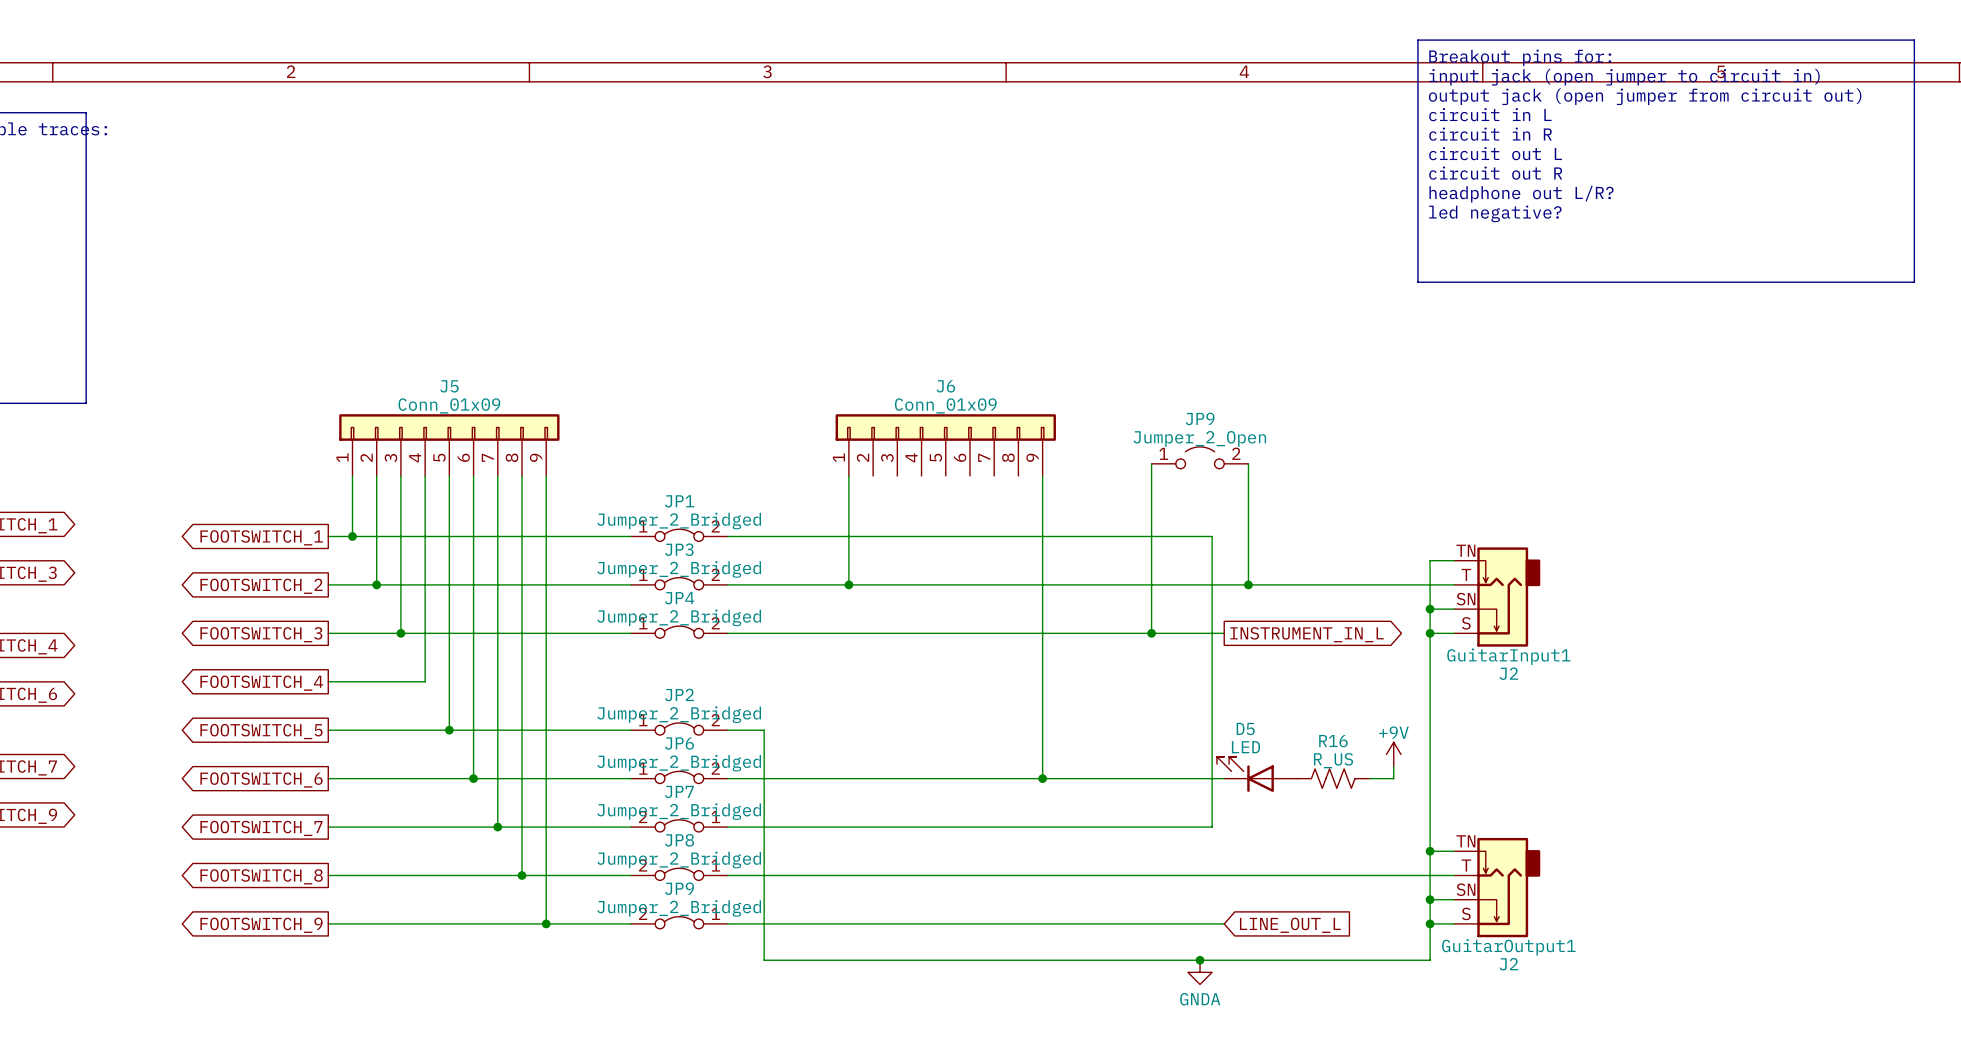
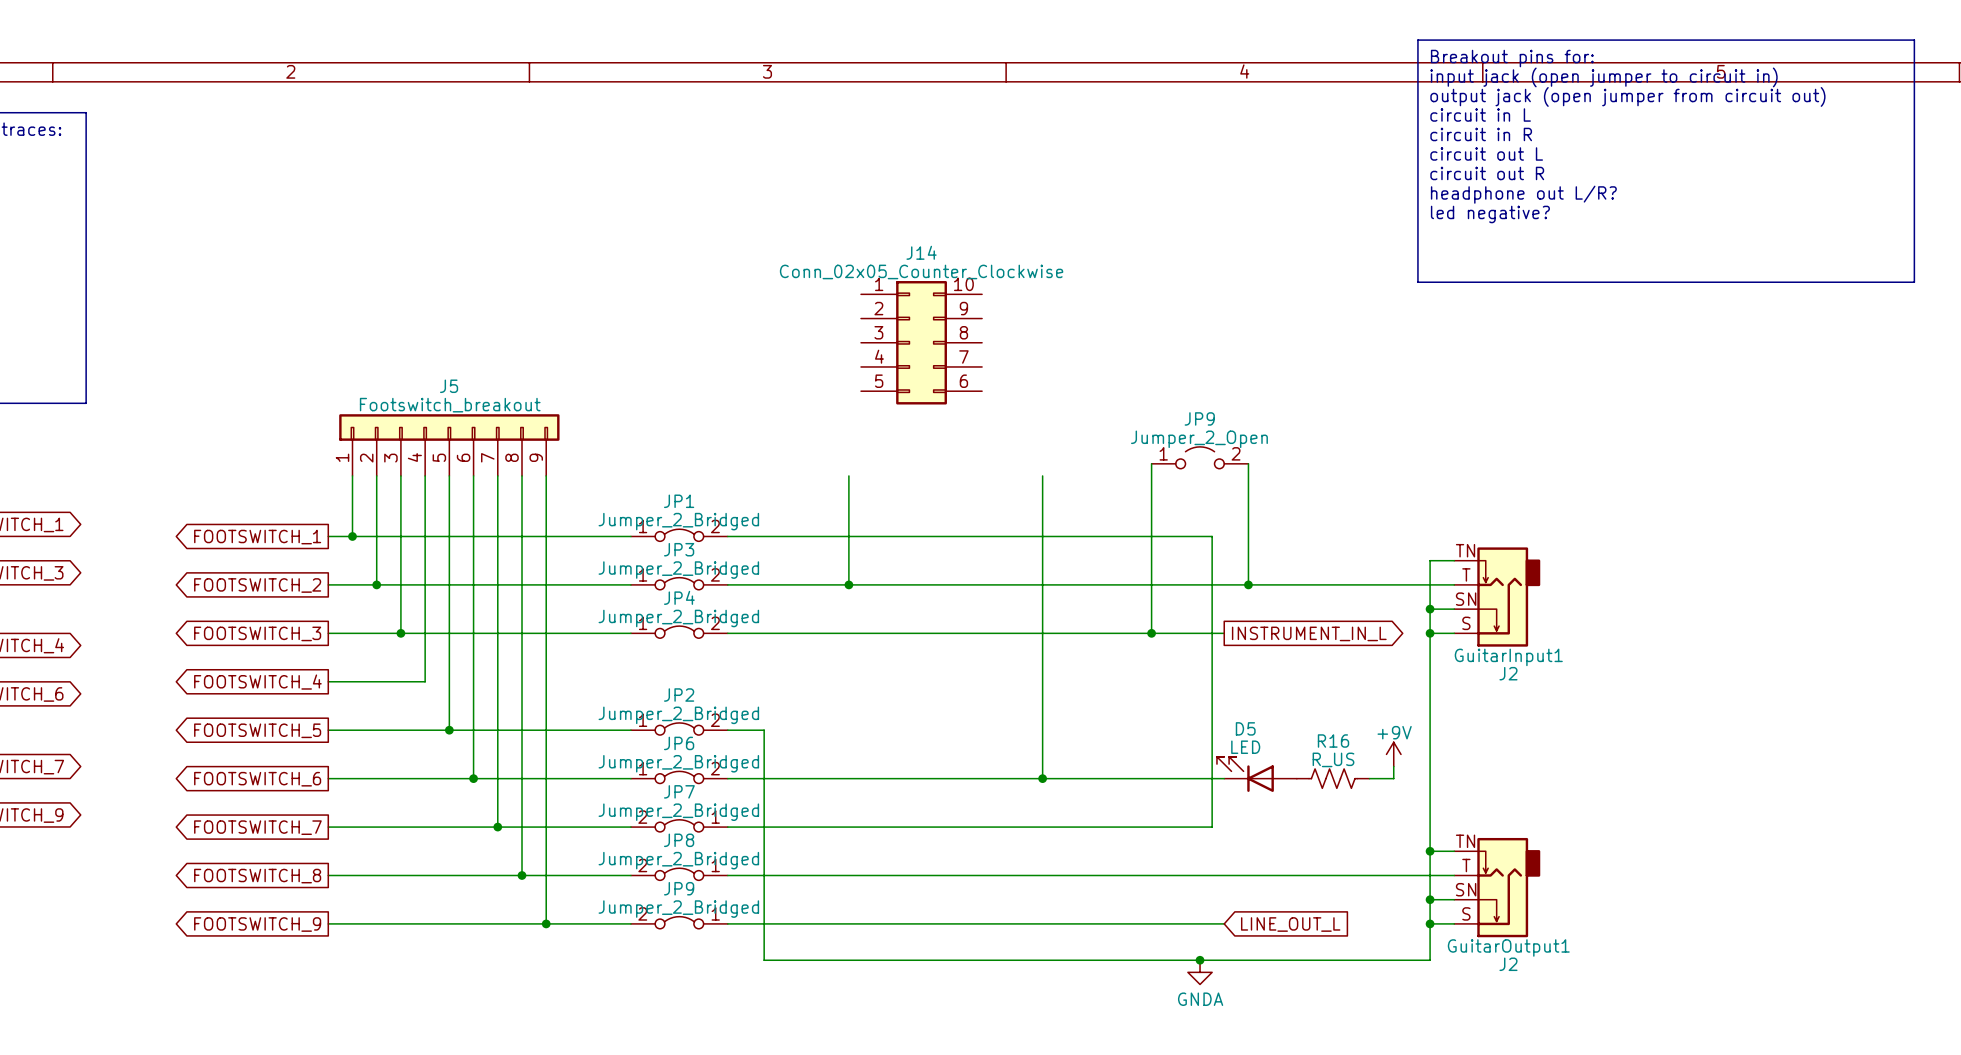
J14: none -> Conn_02x05_Counter_Clockwise (921, 342)
J5 value: Conn_01x09 (449, 405) -> Footswitch_breakout (450, 405)
J6: Conn_01x09 (945, 445) -> none

